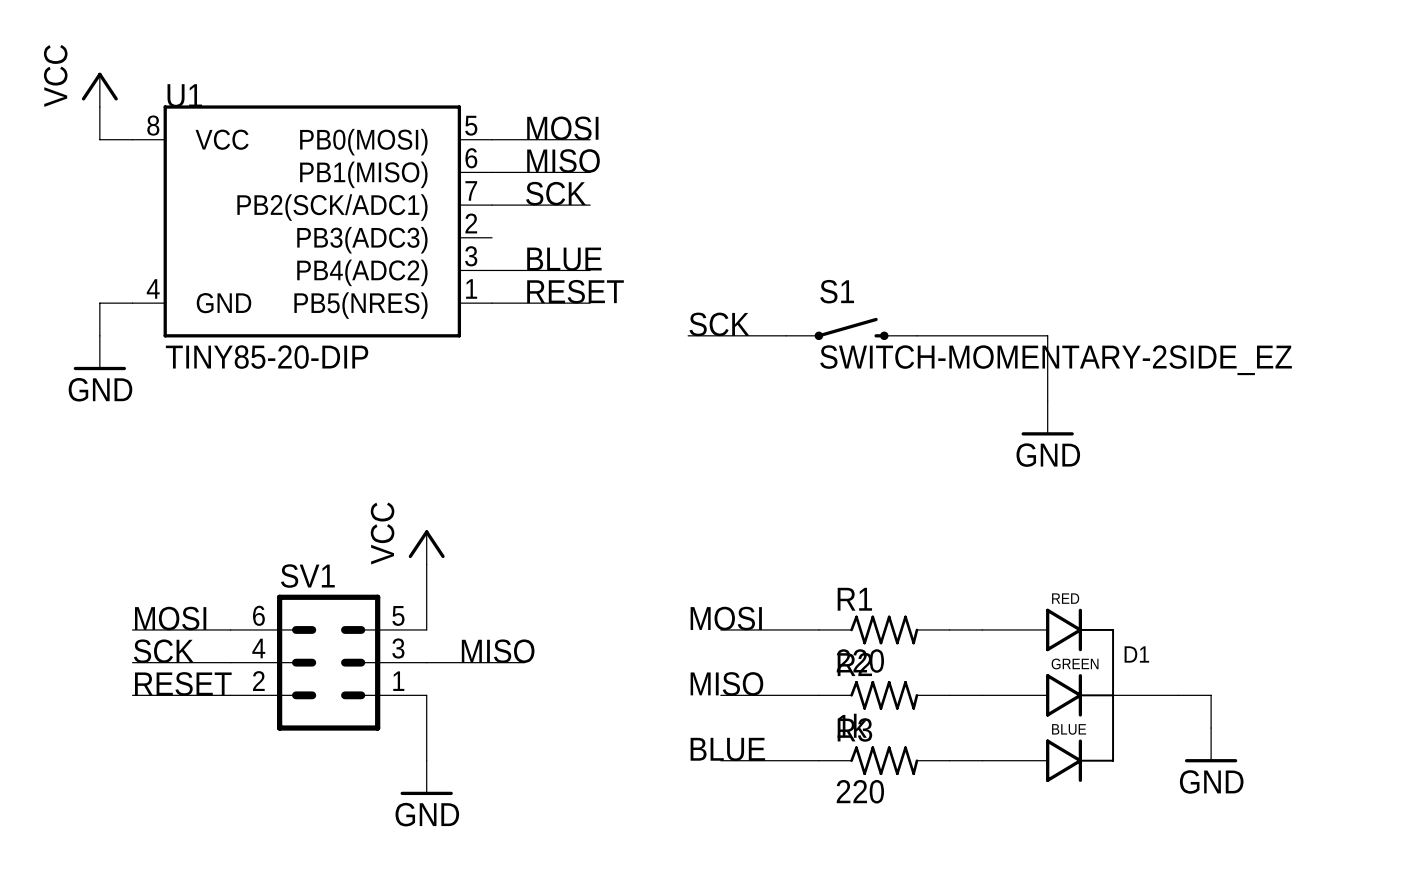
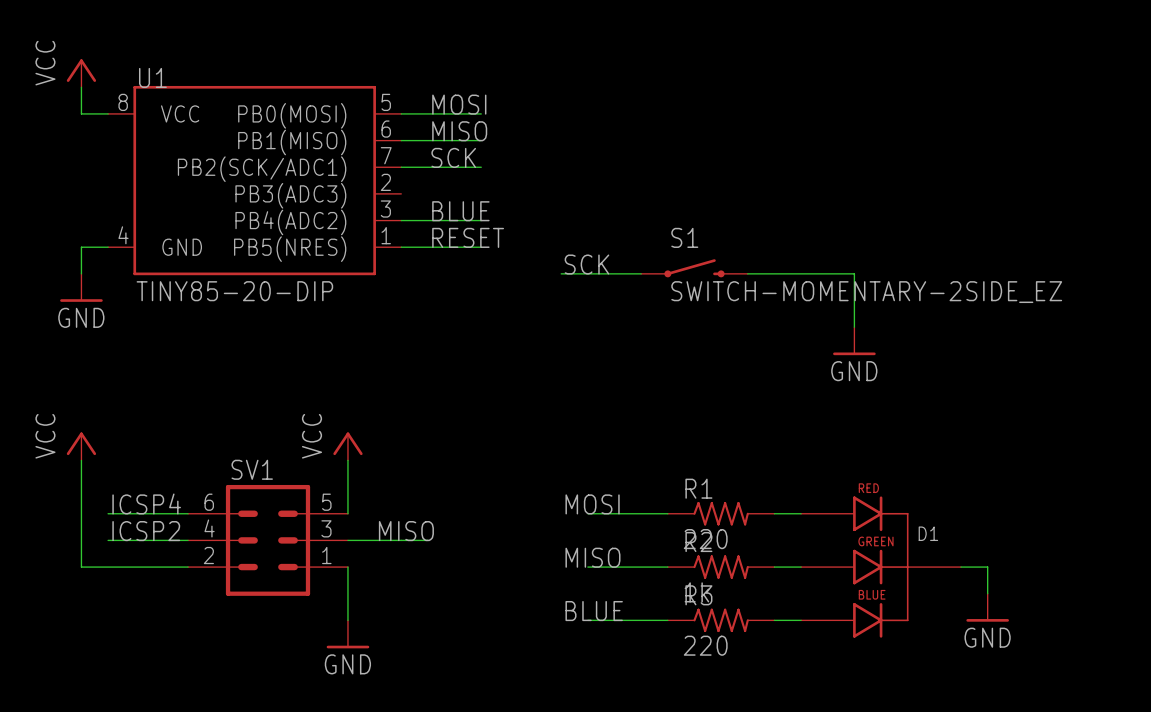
power symbol: none -> VCC (81, 446)
wire: none -> (81, 460) (81, 567) (108, 567)
label: MOSI (170, 618) -> ICSP4 (146, 503)
label: SCK (163, 651) -> ICSP2 (146, 531)
label: RESET (183, 683) -> none

